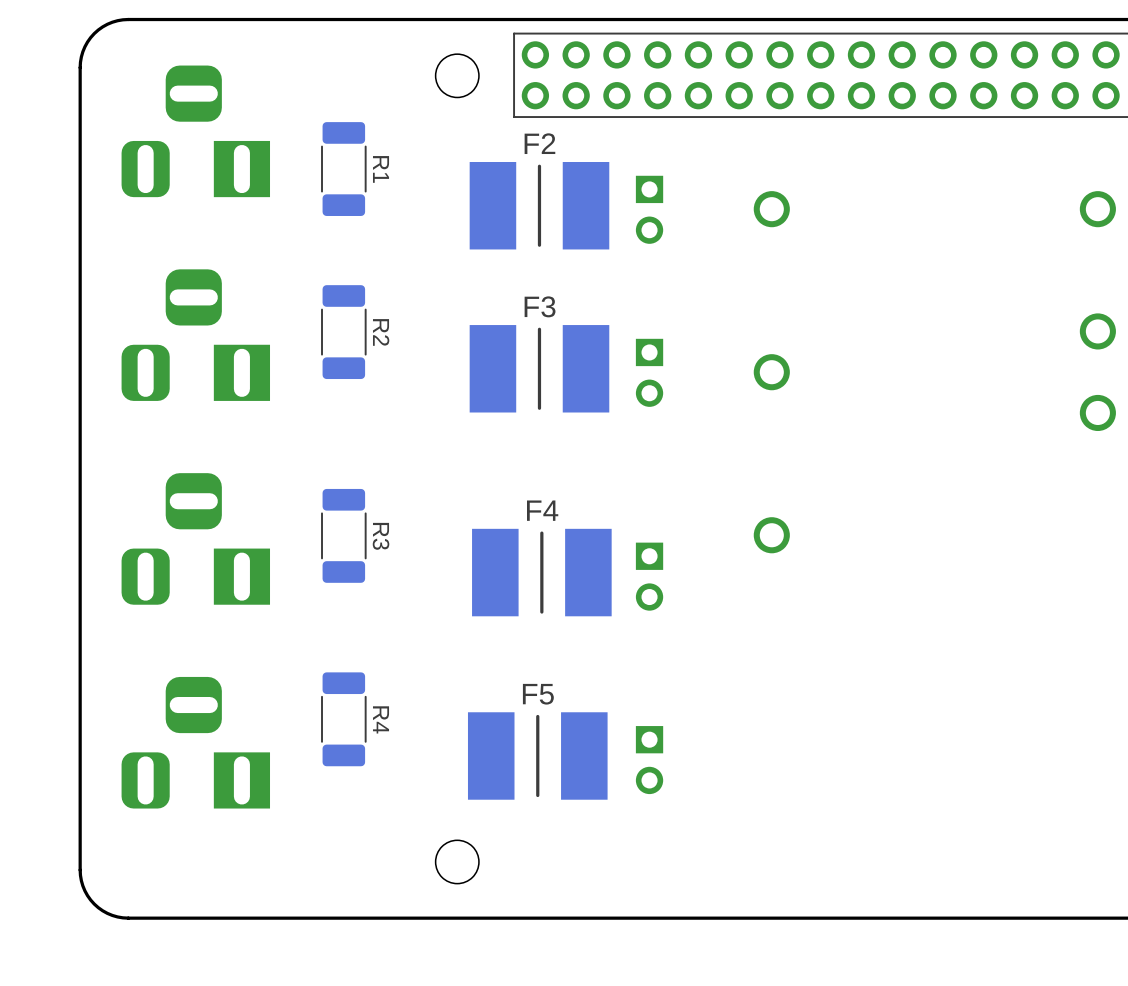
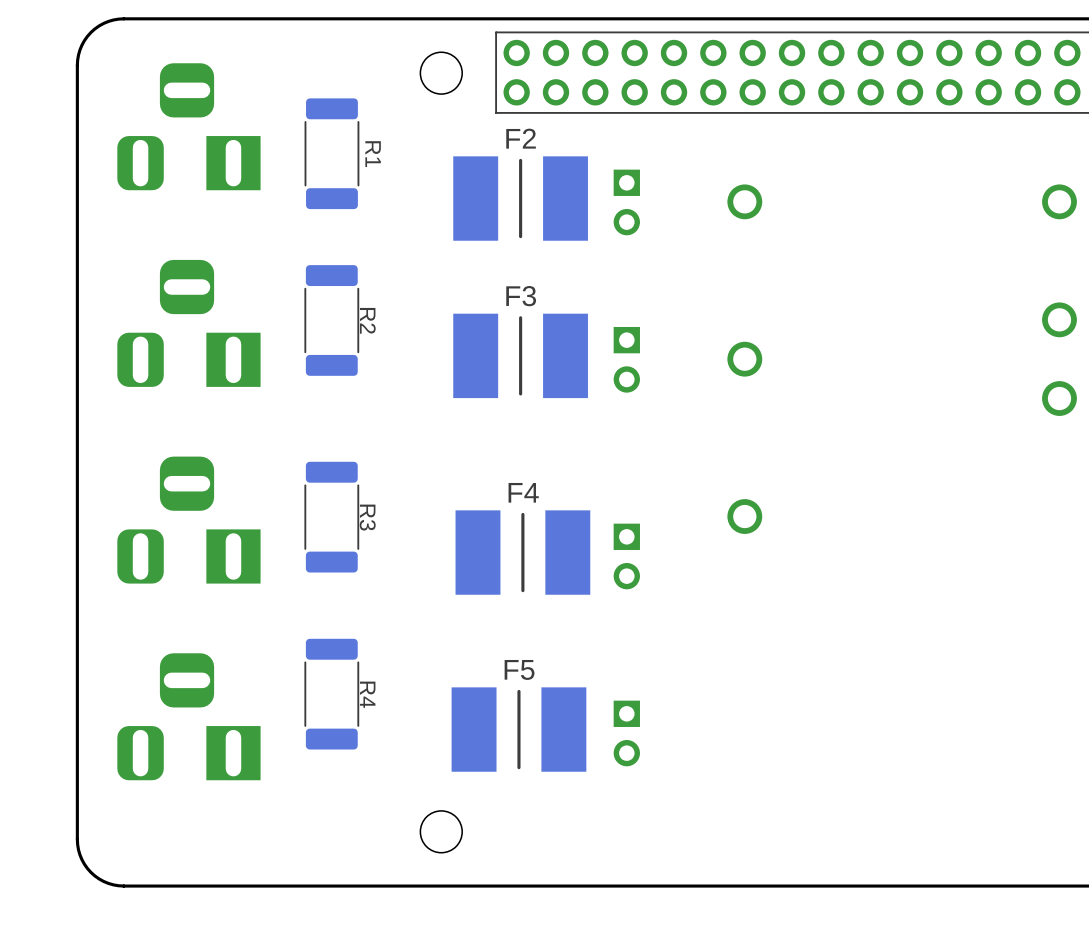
R1 footprint: [321, 122, 367, 216] -> [304, 98, 360, 210]
R2 footprint: [321, 285, 367, 380] -> [304, 265, 360, 376]
R3 footprint: [321, 488, 367, 583] -> [304, 461, 360, 573]
R4 footprint: [321, 672, 367, 767] -> [304, 638, 360, 750]

